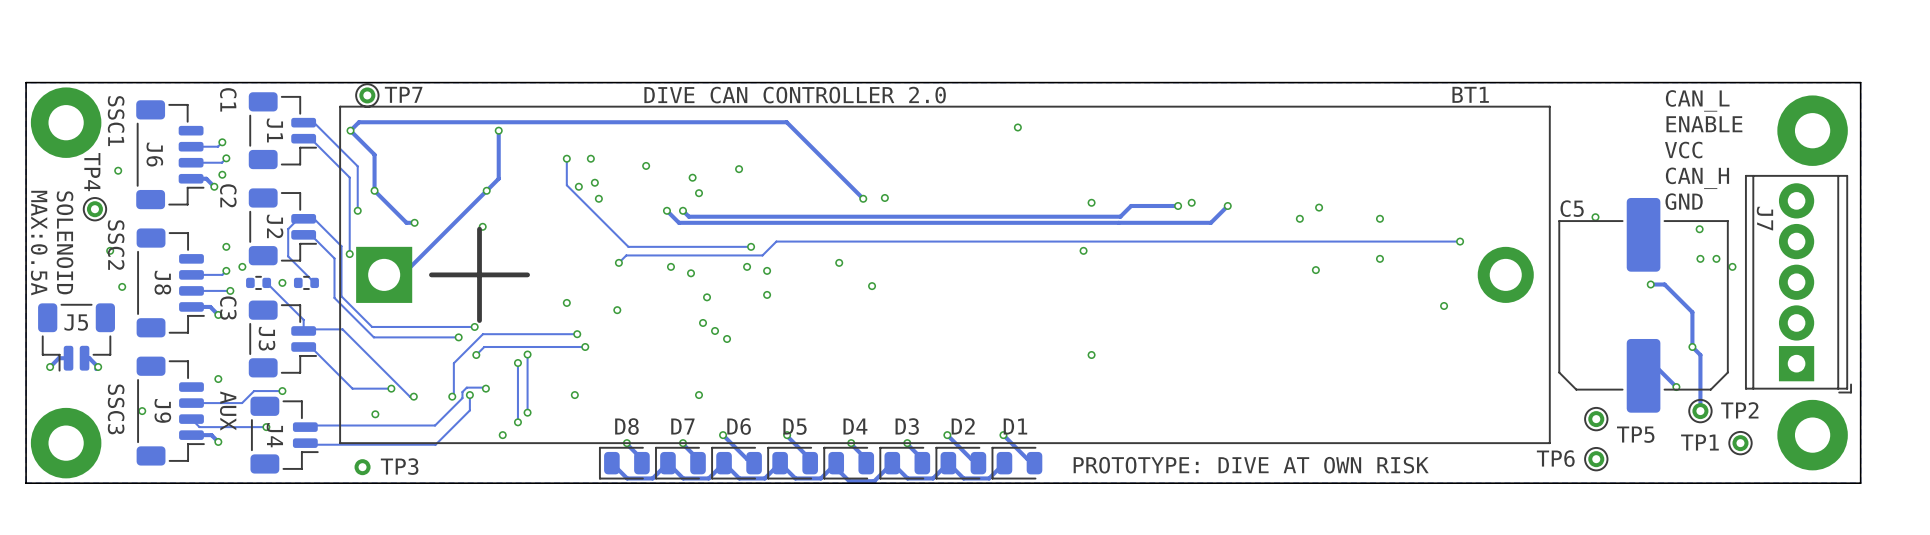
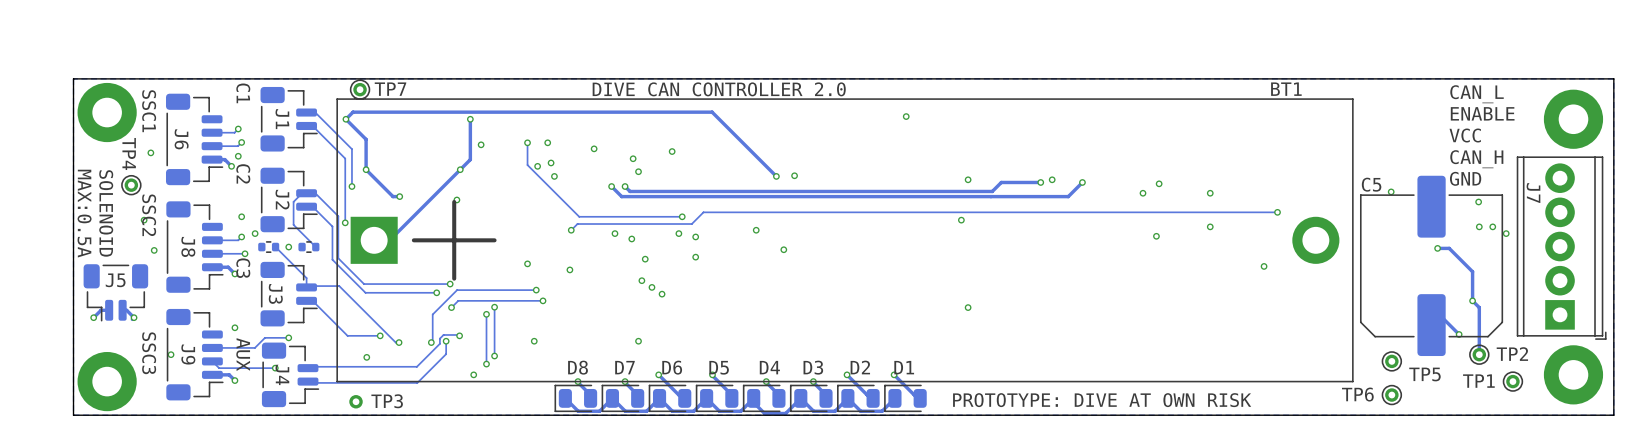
via: none -> (481, 144)

